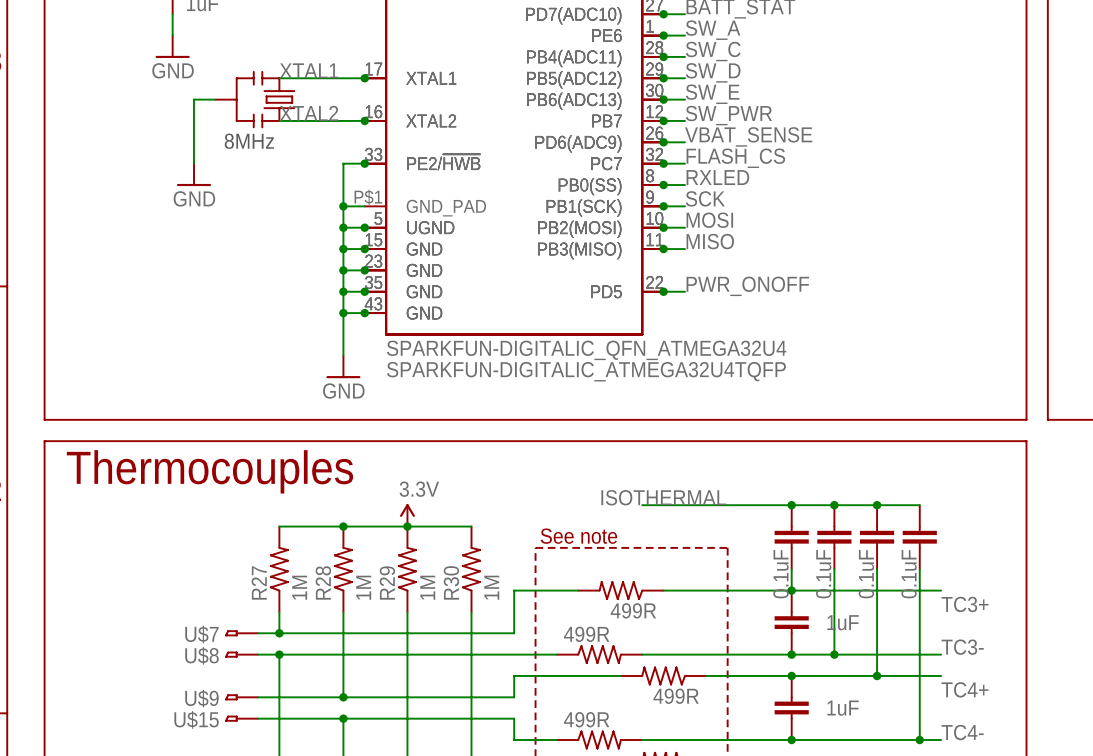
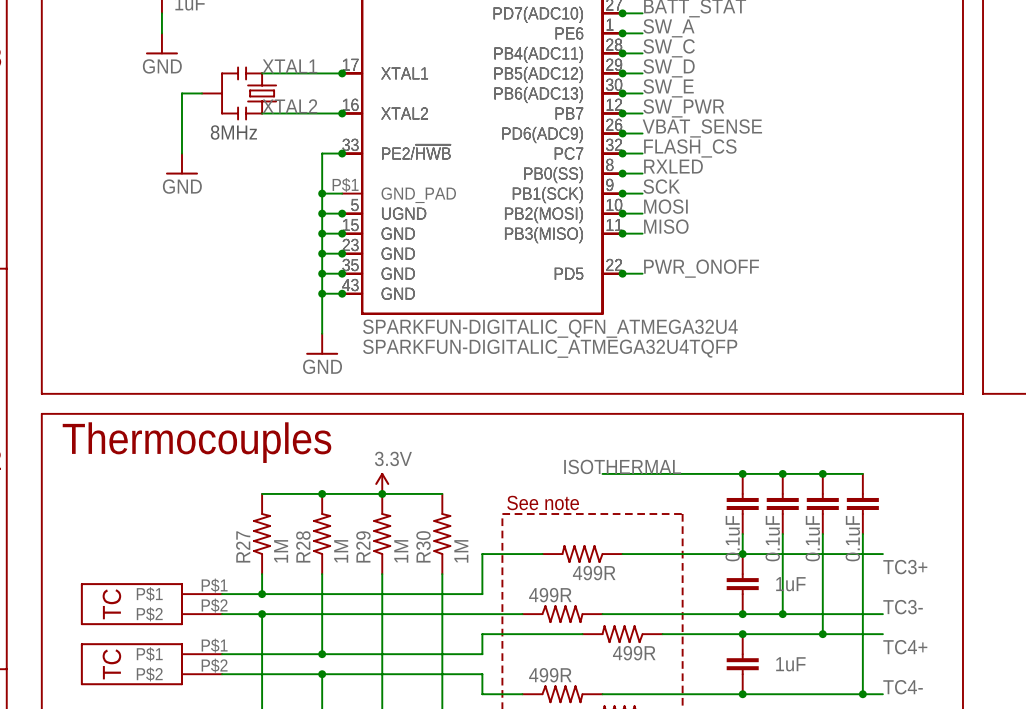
U$7: (241, 633) -> none
part: none -> (151, 604)
U$8: (241, 654) -> none
U$9: (241, 697) -> none
part: none -> (151, 664)
U$15: (241, 718) -> none

